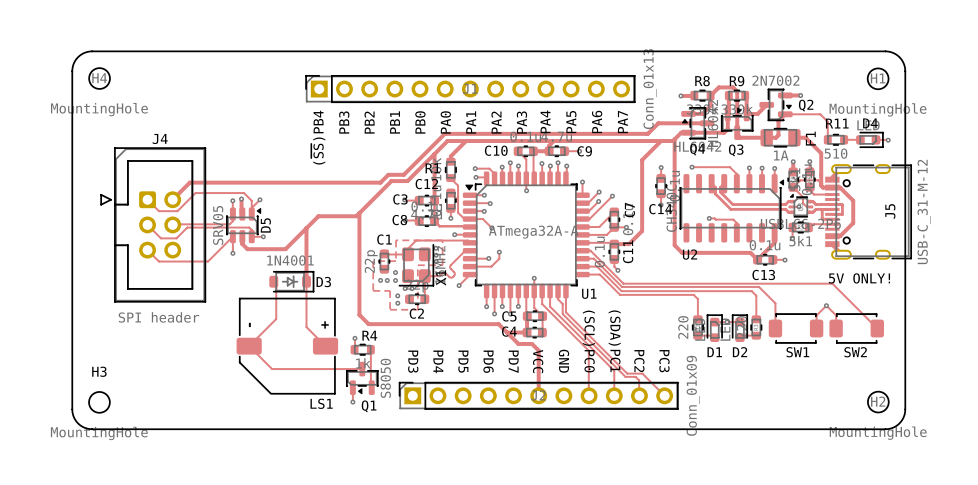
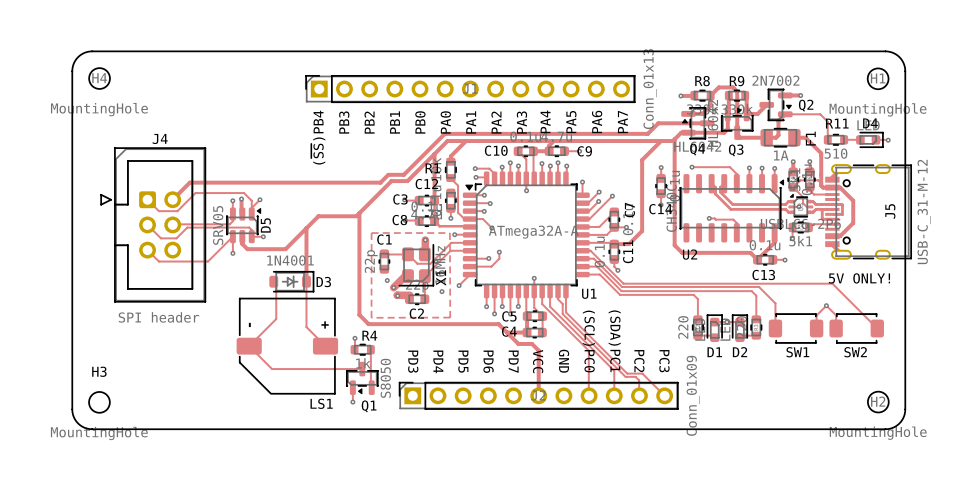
zone outline: (396, 240) (442, 240) (442, 265) (417, 265) (417, 309) (390, 309) (390, 290) (373, 290) (373, 261) (396, 261) (396, 240) -> (371, 233) (371, 317) (450, 317) (449, 233) (371, 233)
track: none -> (425, 240) (425, 253)
via: none -> (425, 240)
track: (470, 242) (467, 240) (416, 240) (408, 248) (408, 254) -> (470, 242) (451, 242) (430, 263) (417, 263) (408, 254)
via: (435, 248) -> none
track: (465, 250) (450, 265) (454, 273) (452, 277) (444, 272) (439, 276) (424, 276) -> (465, 250) (450, 250) (425, 276)
via: (436, 255) -> none
via: (395, 272) -> none
track: none -> (408, 276) (405, 276) (393, 287)
via: (380, 280) -> none
via: (395, 280) -> none
via: none -> (393, 287)
via: (405, 288) -> none
via: (411, 288) -> none
via: none -> (442, 291)
track: none -> (397, 295) (409, 295)
via: (397, 303) -> none

